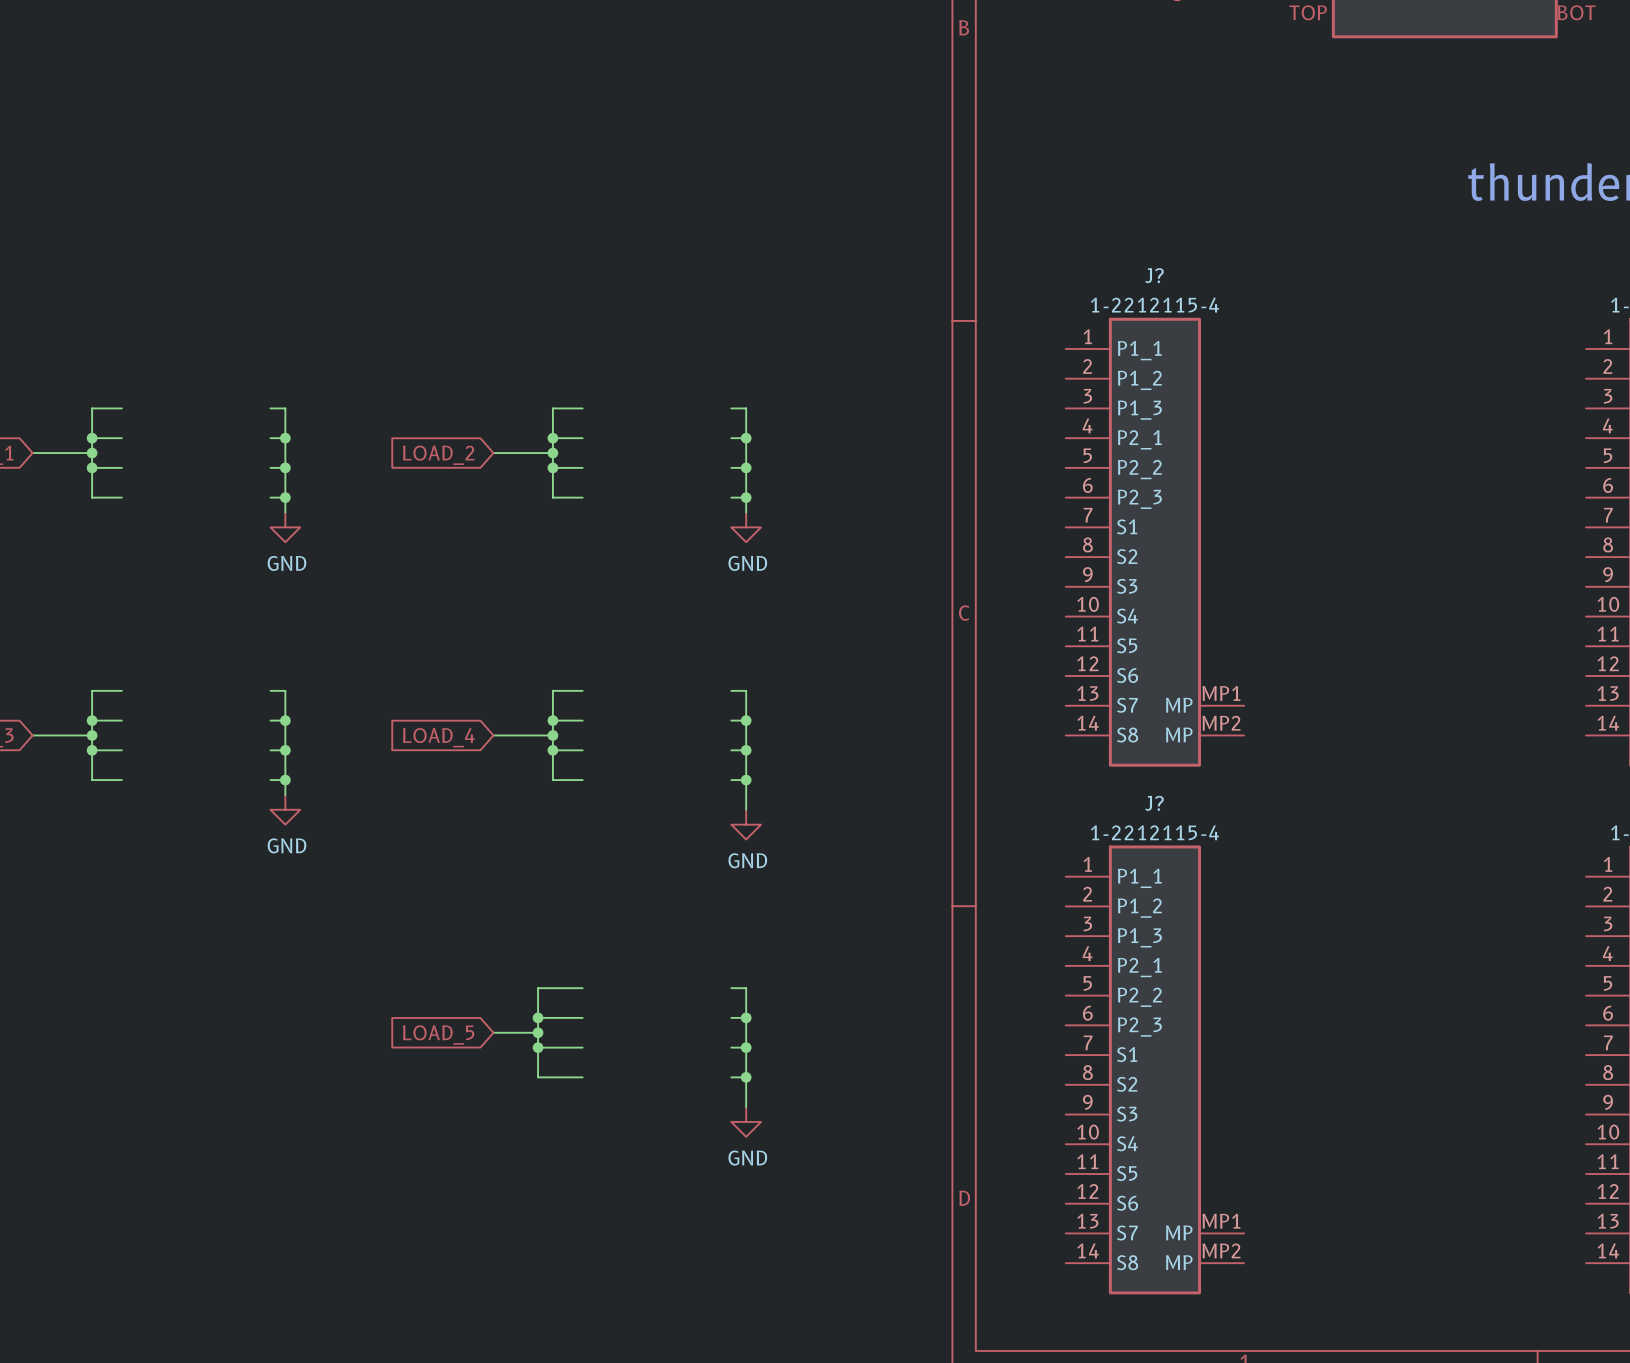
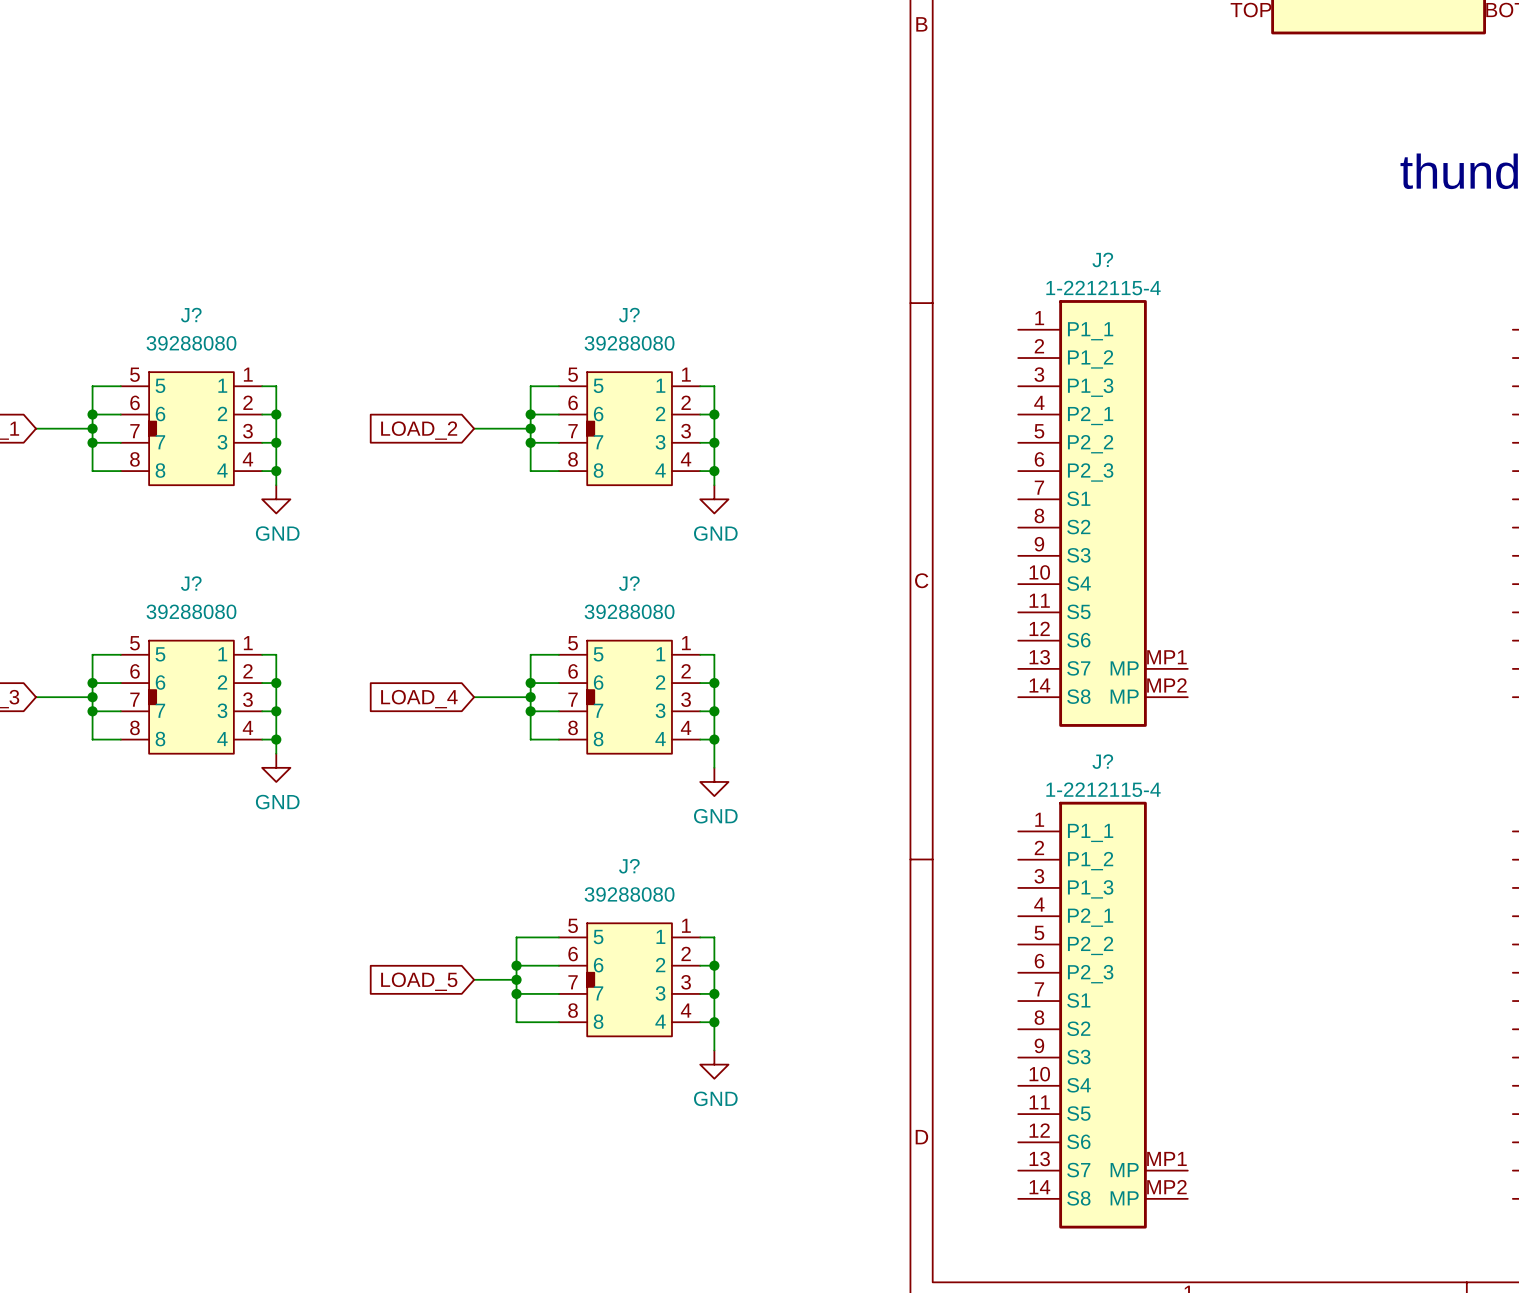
J?: none -> 39288080 (191, 428)
J?: none -> 39288080 (629, 428)
J?: none -> 39288080 (191, 697)
J?: none -> 39288080 (629, 697)
J?: none -> 39288080 (629, 979)

